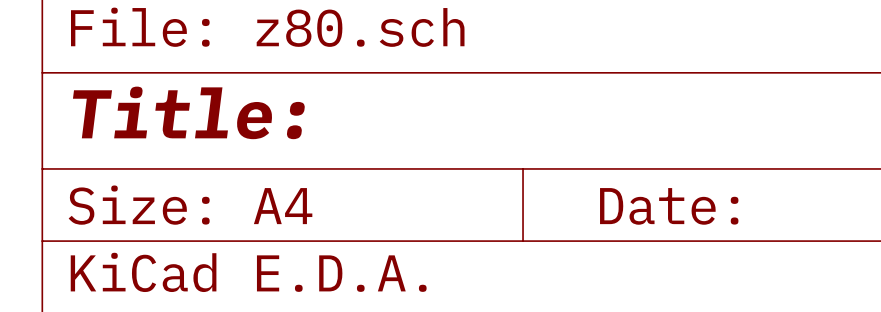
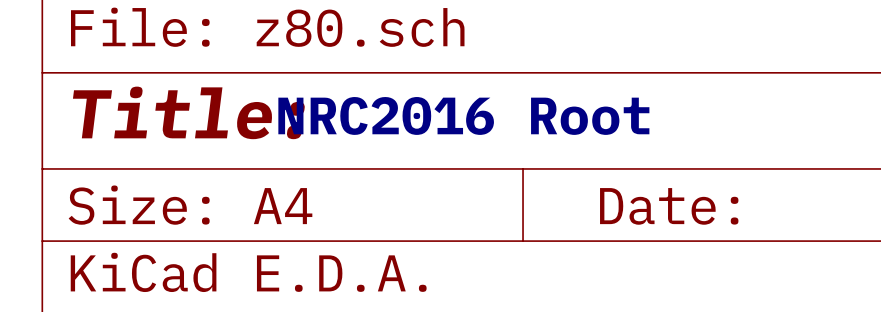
text: none -> NRC2016 Root (463, 115)

